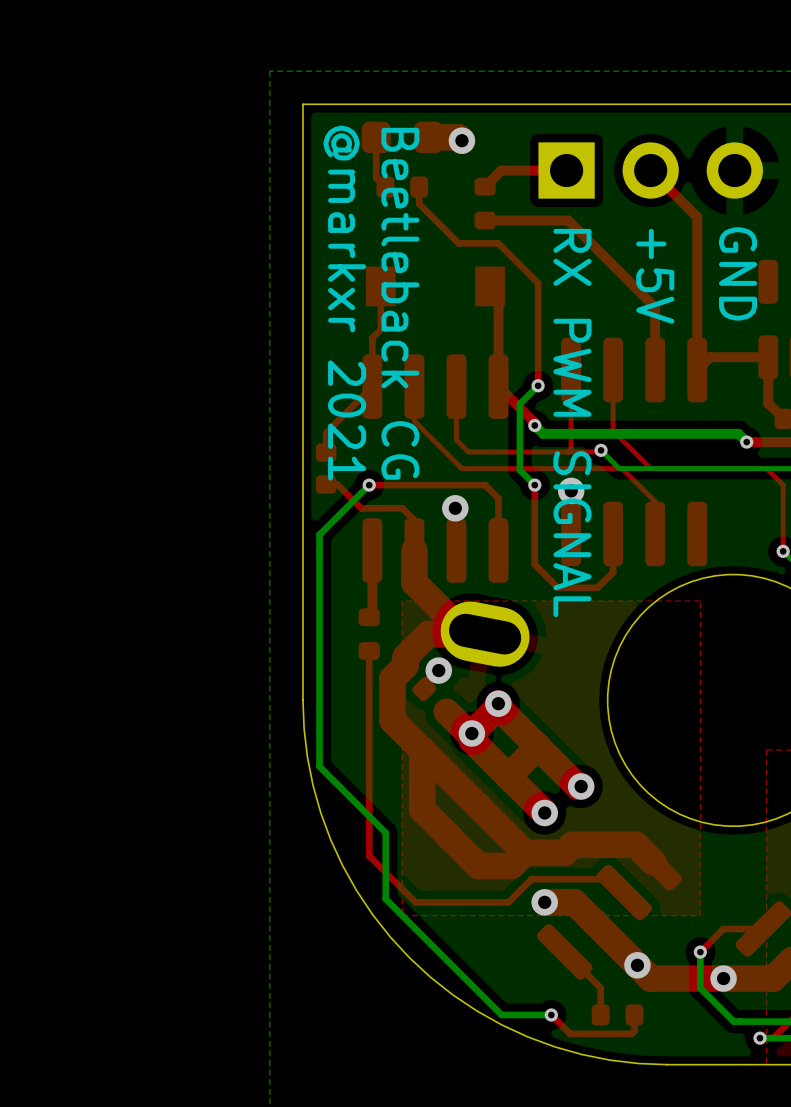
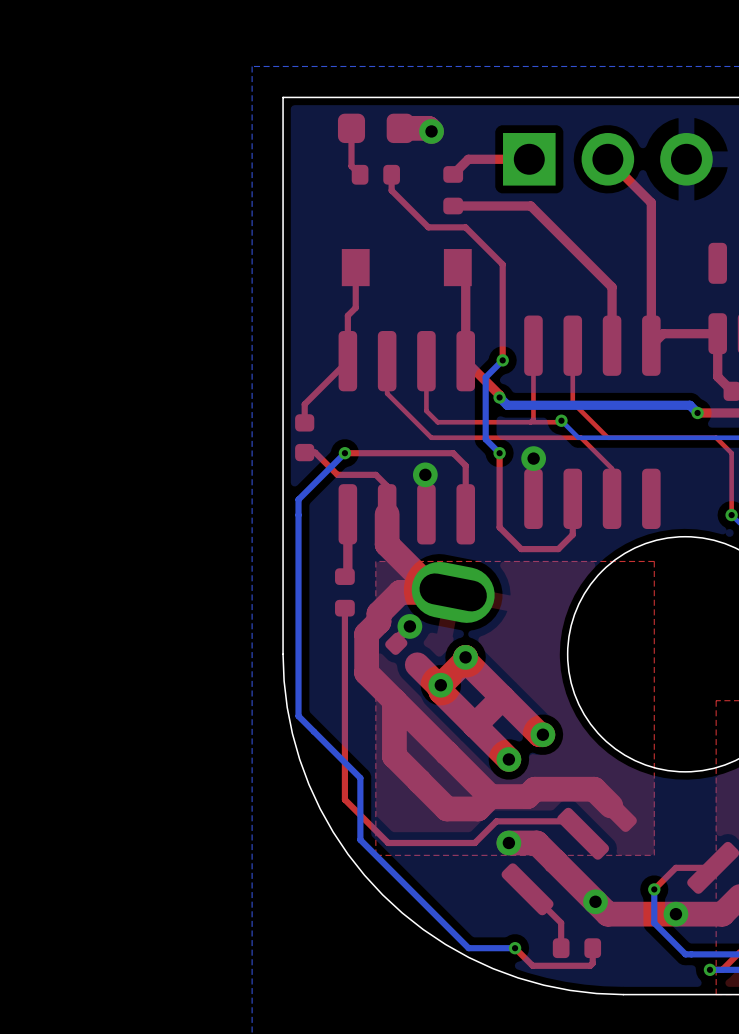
text: GND (738, 273) -> none
text: +5V (655, 276) -> none
text: @markxr 2021 (344, 302) -> none
text: Beetleback CG (400, 303) -> none
text: RX PWM SIGNAL (572, 422) -> none

